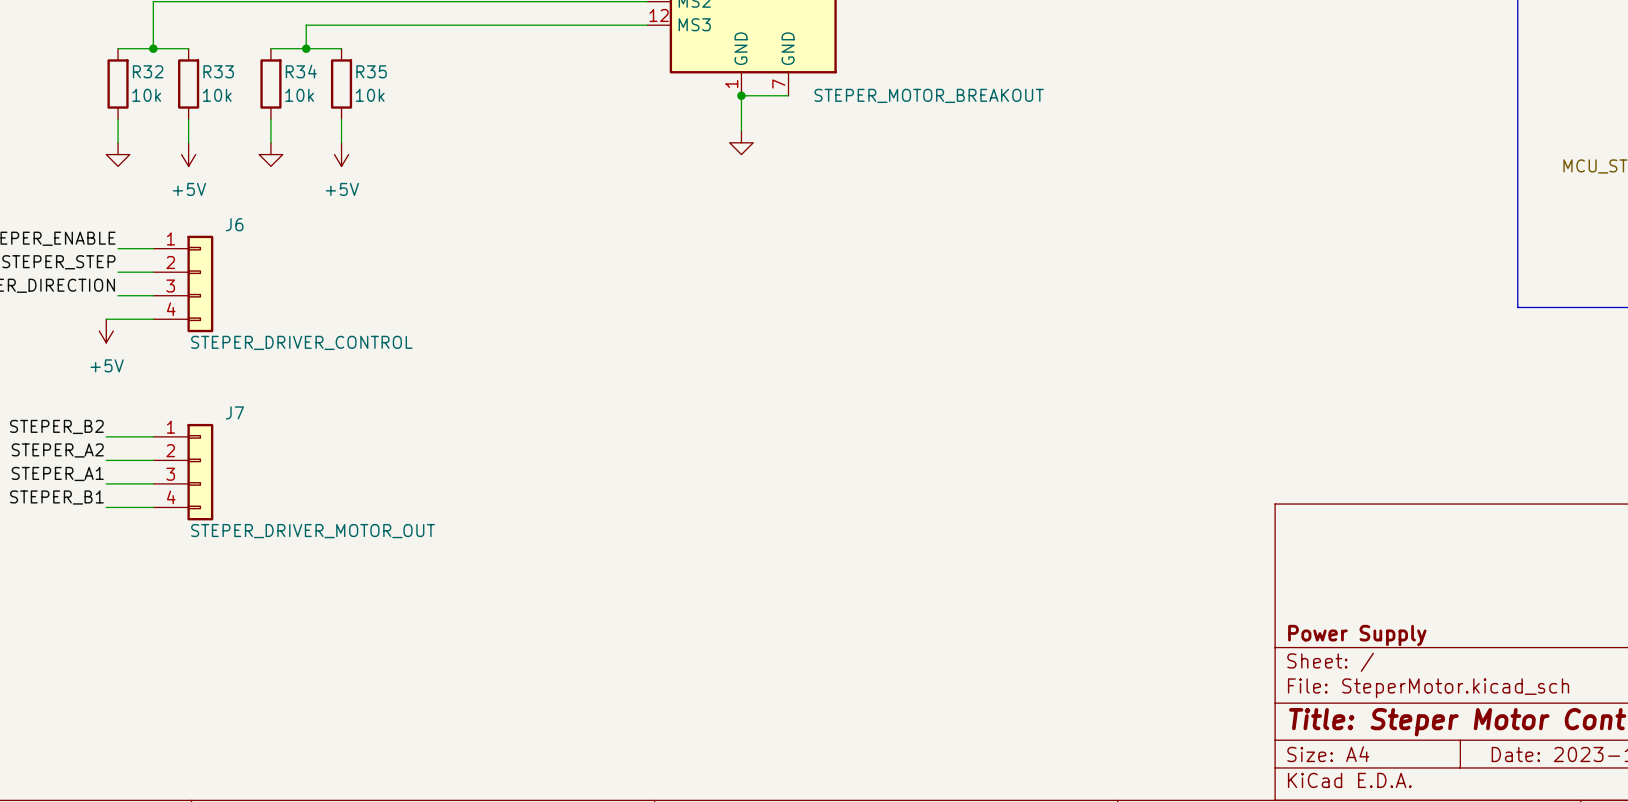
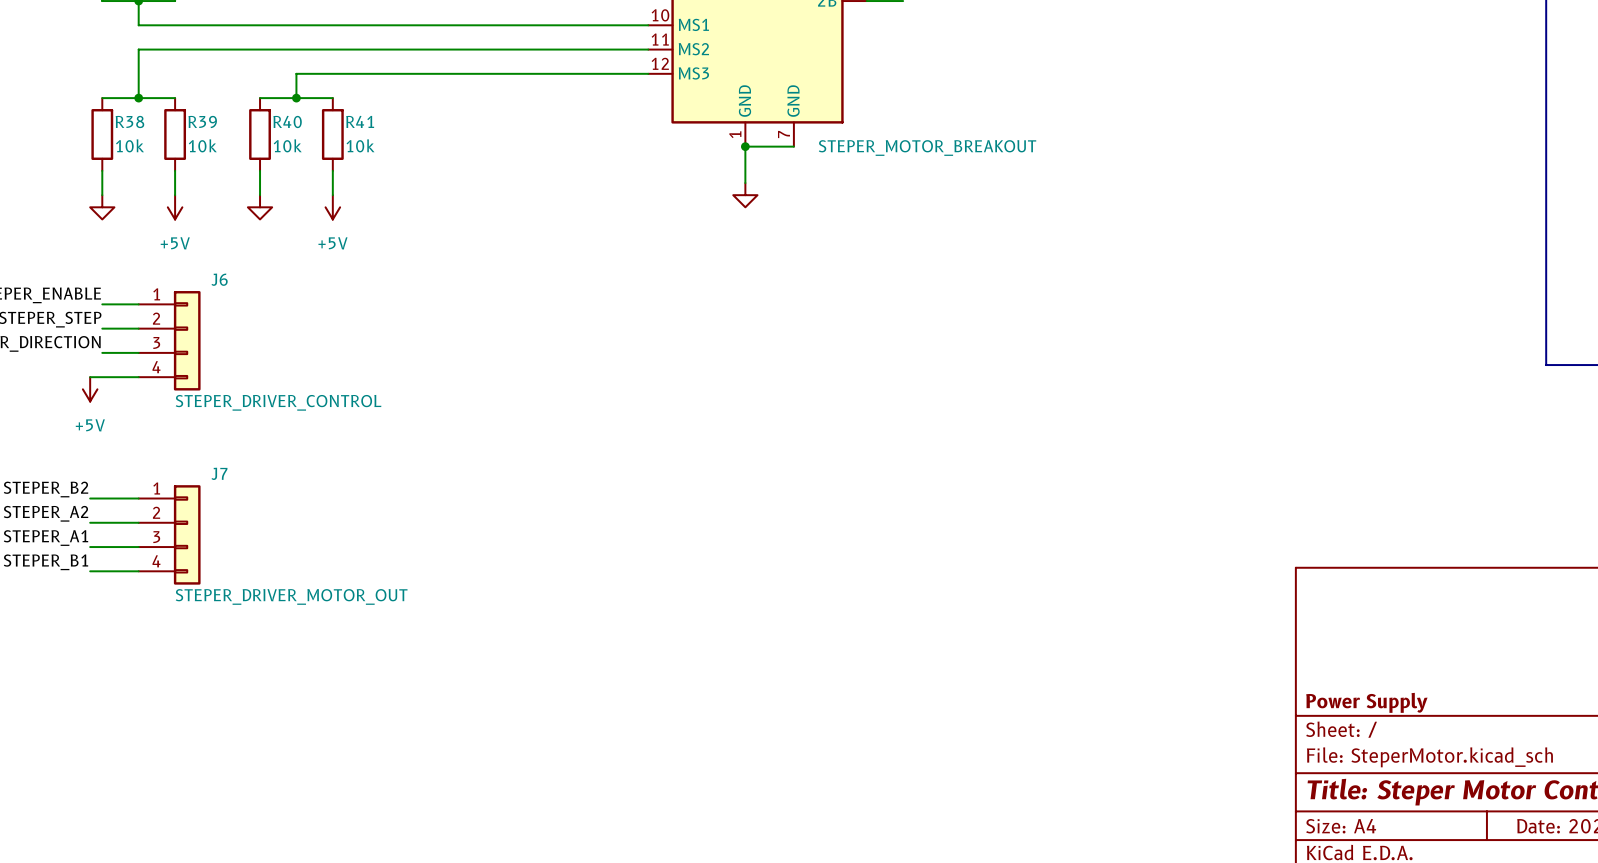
R32 name: R32 (148, 71) -> R38 (129, 121)
R33 name: R33 (218, 71) -> R39 (202, 121)
R34 name: R34 (301, 71) -> R40 (287, 121)
R35 name: R35 (371, 71) -> R41 (360, 121)

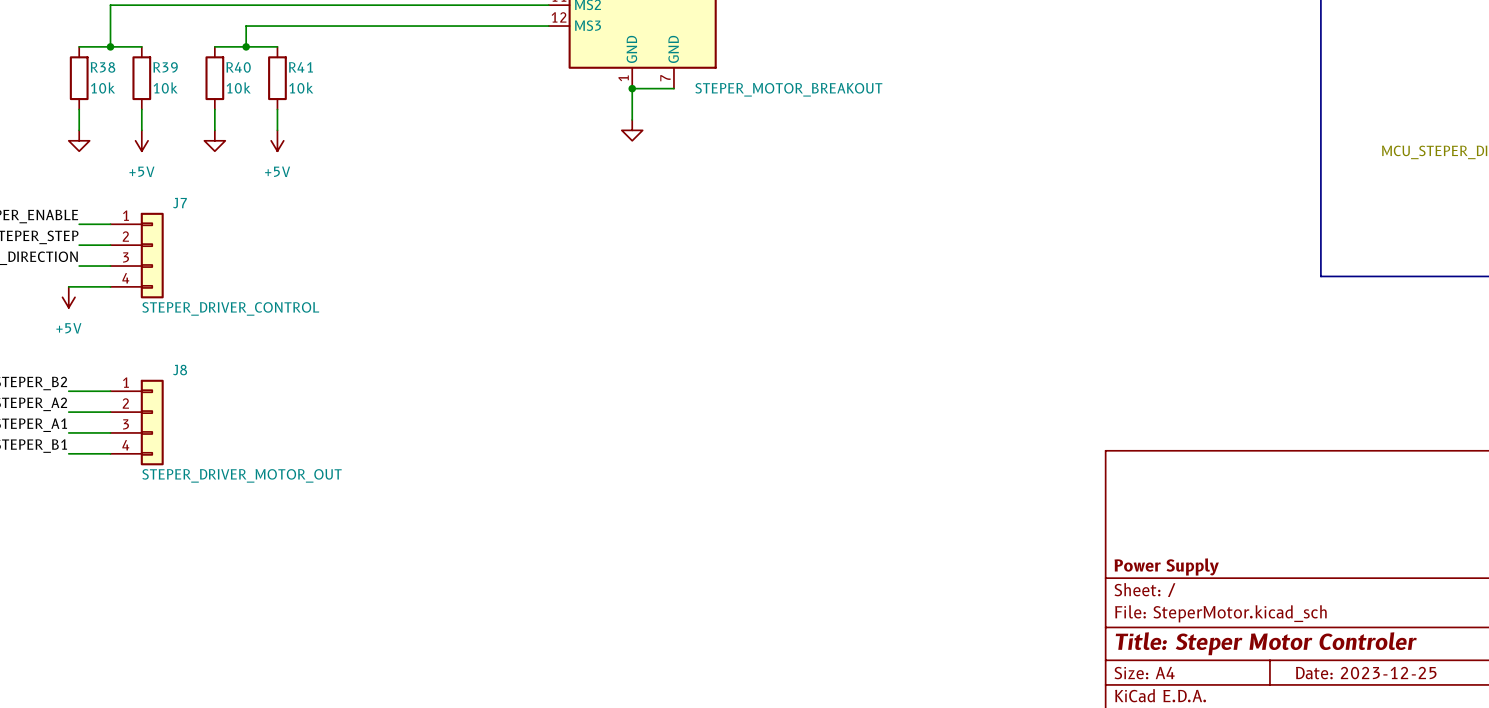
J6 name: J6 (219, 279) -> J7 (179, 203)
J7 name: J7 (219, 473) -> J8 (180, 370)

